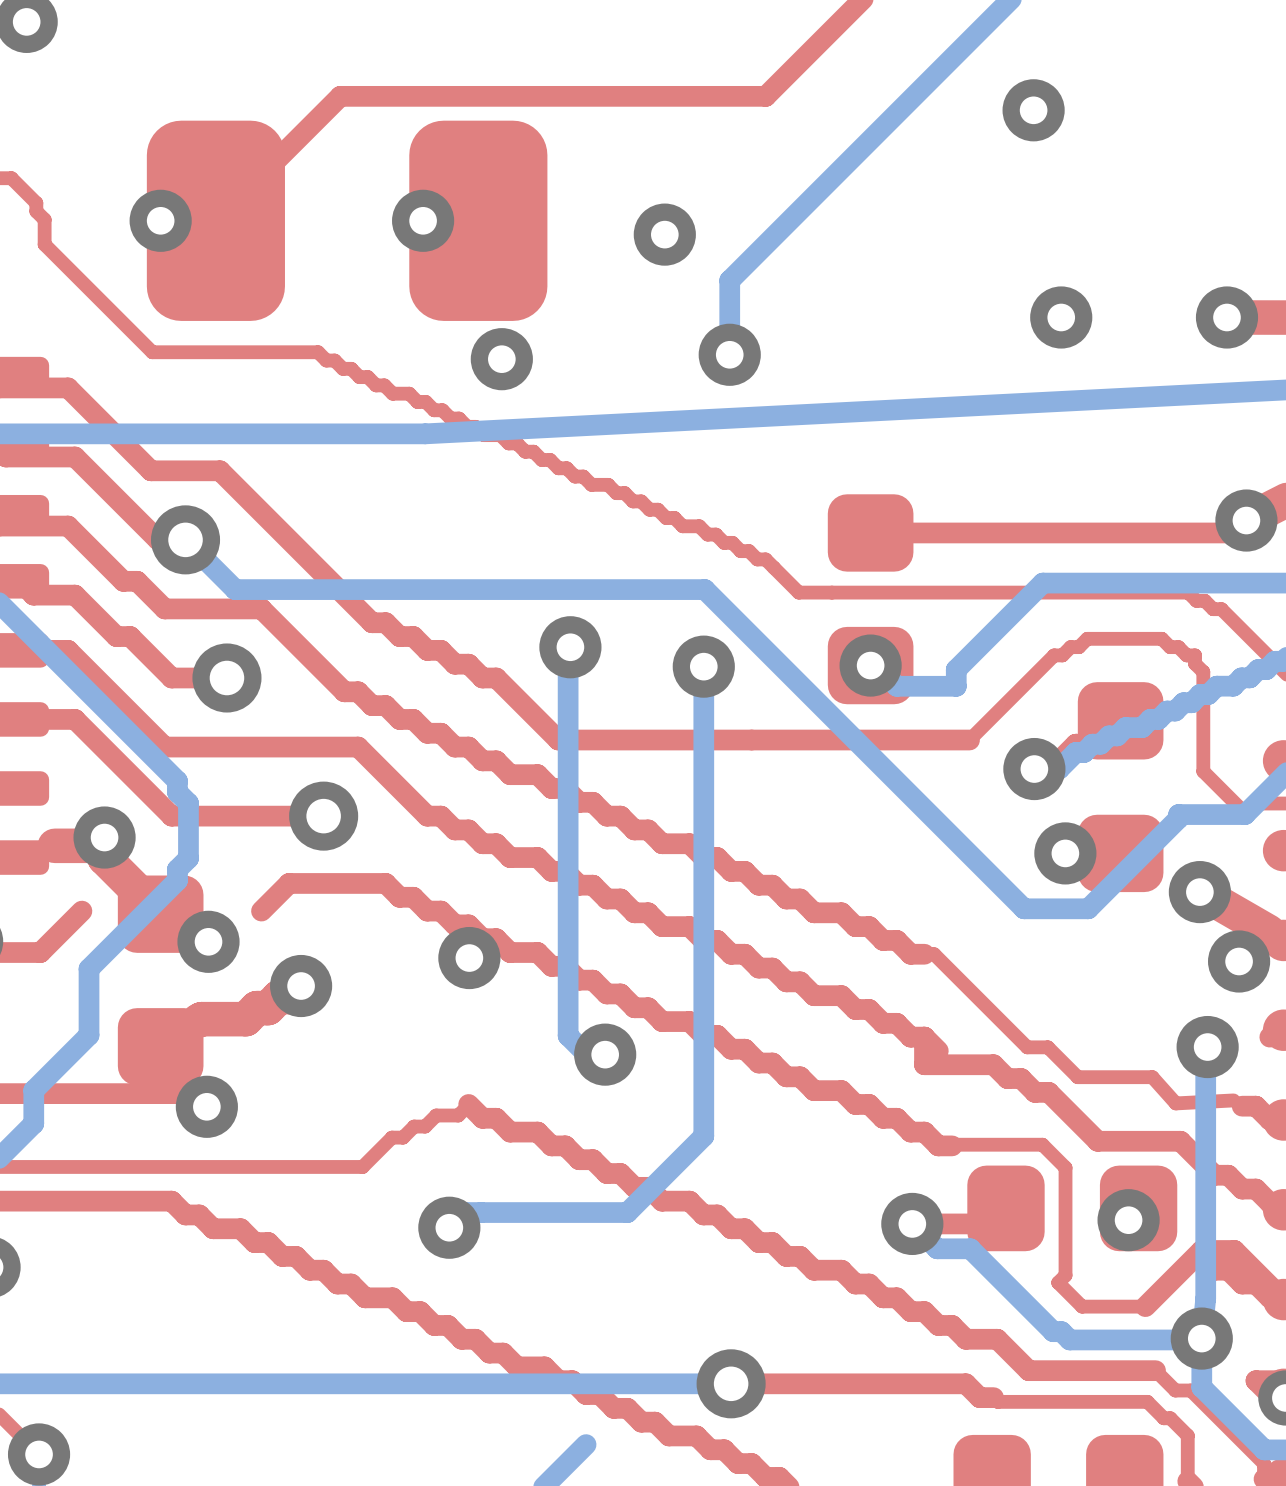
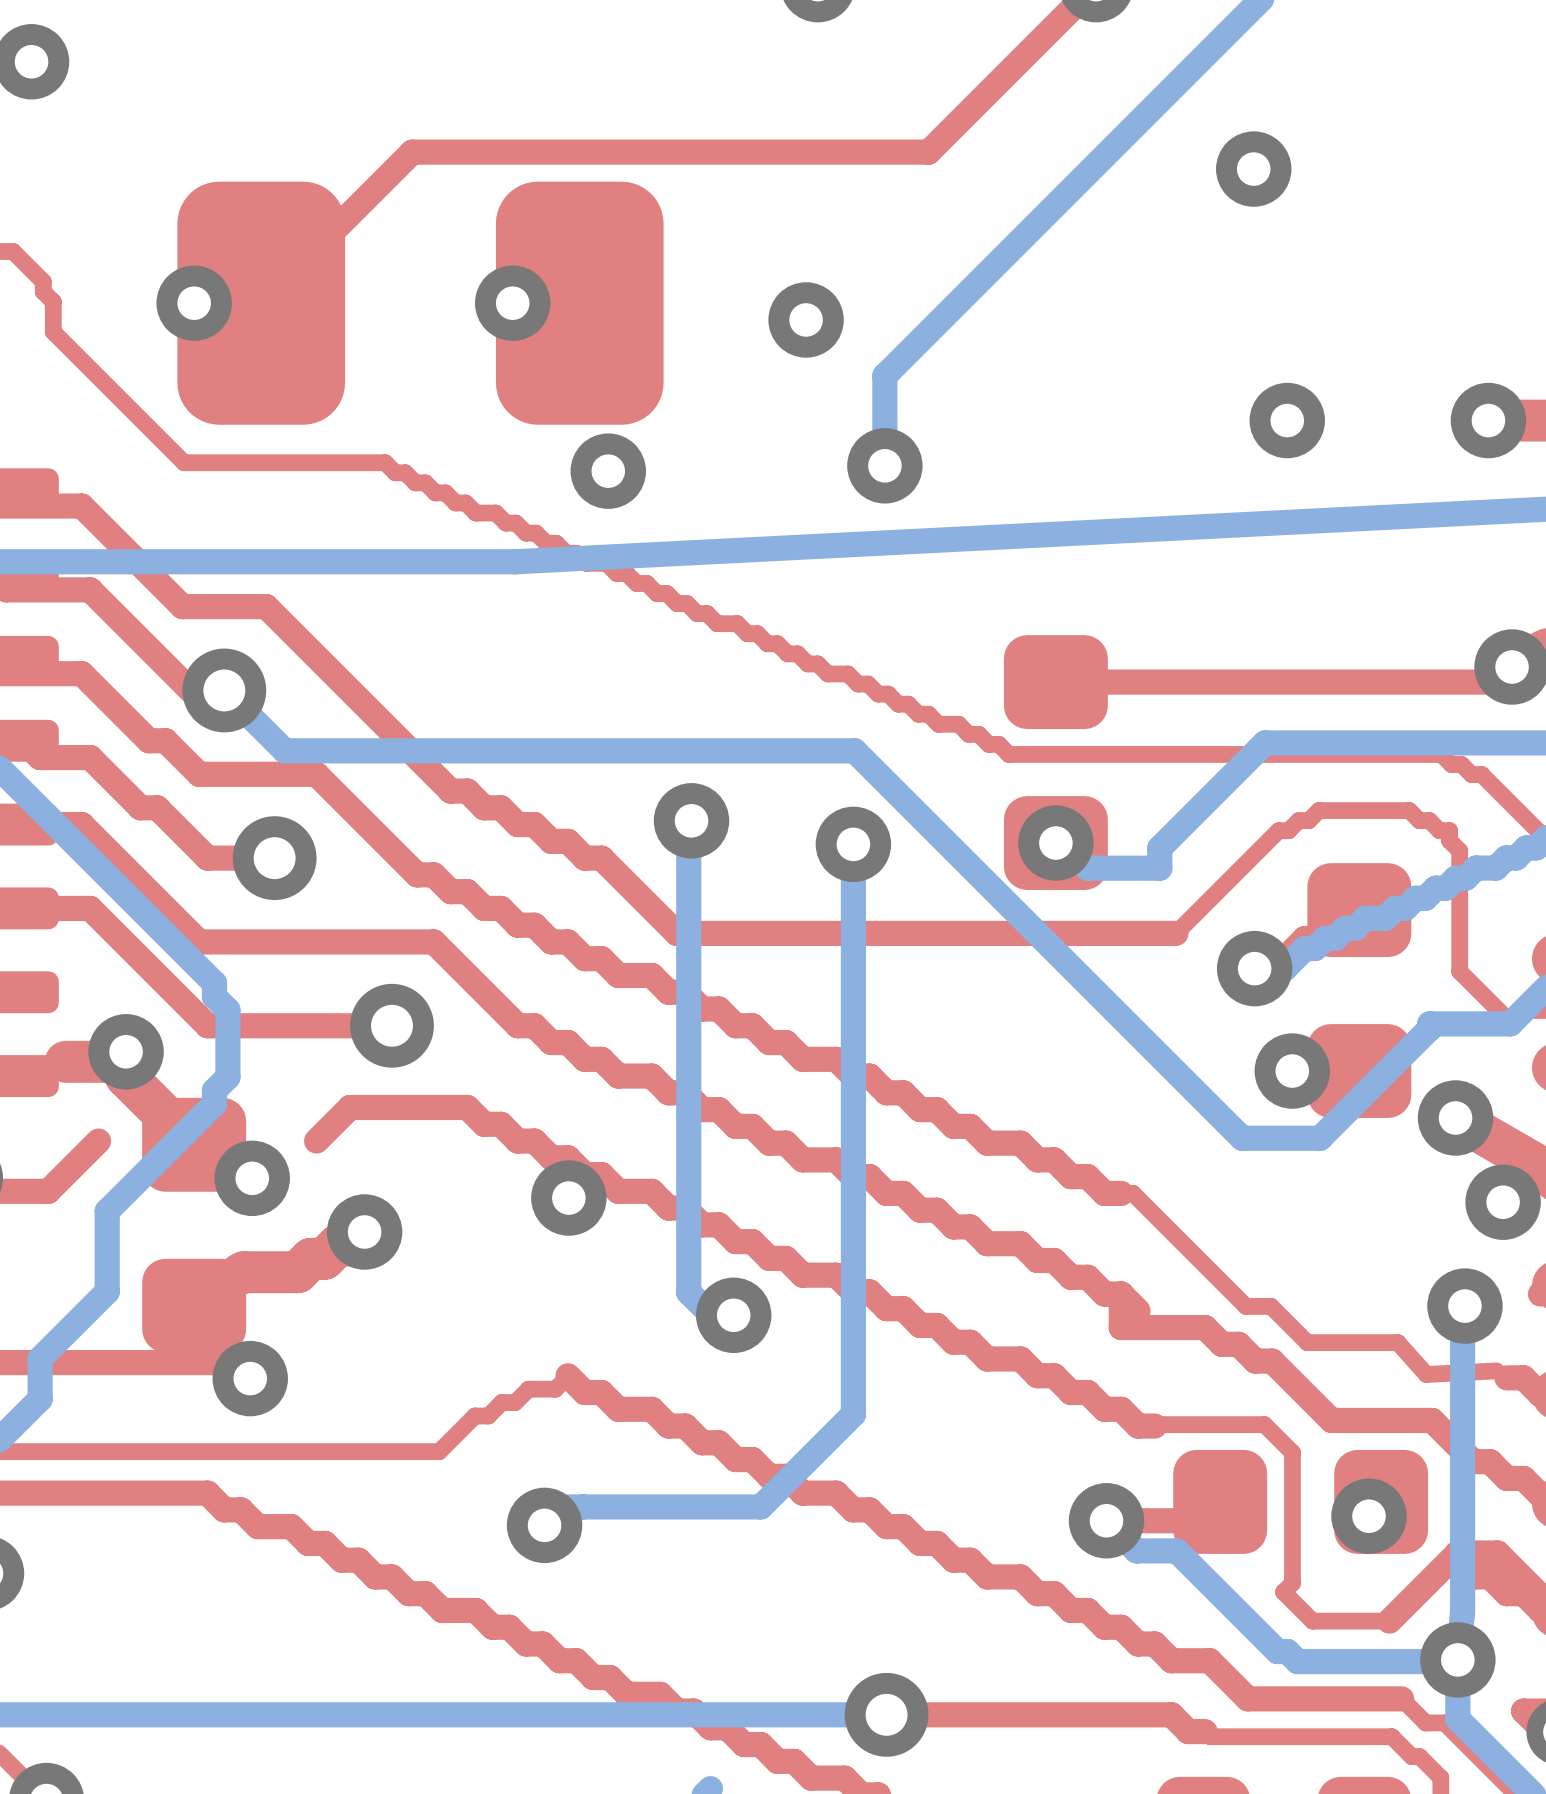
top track: (773, 567) (798, 592) (831, 592) -> (938, 724) (958, 724) (968, 734) (978, 734) (988, 744) (998, 744) (1008, 754)

